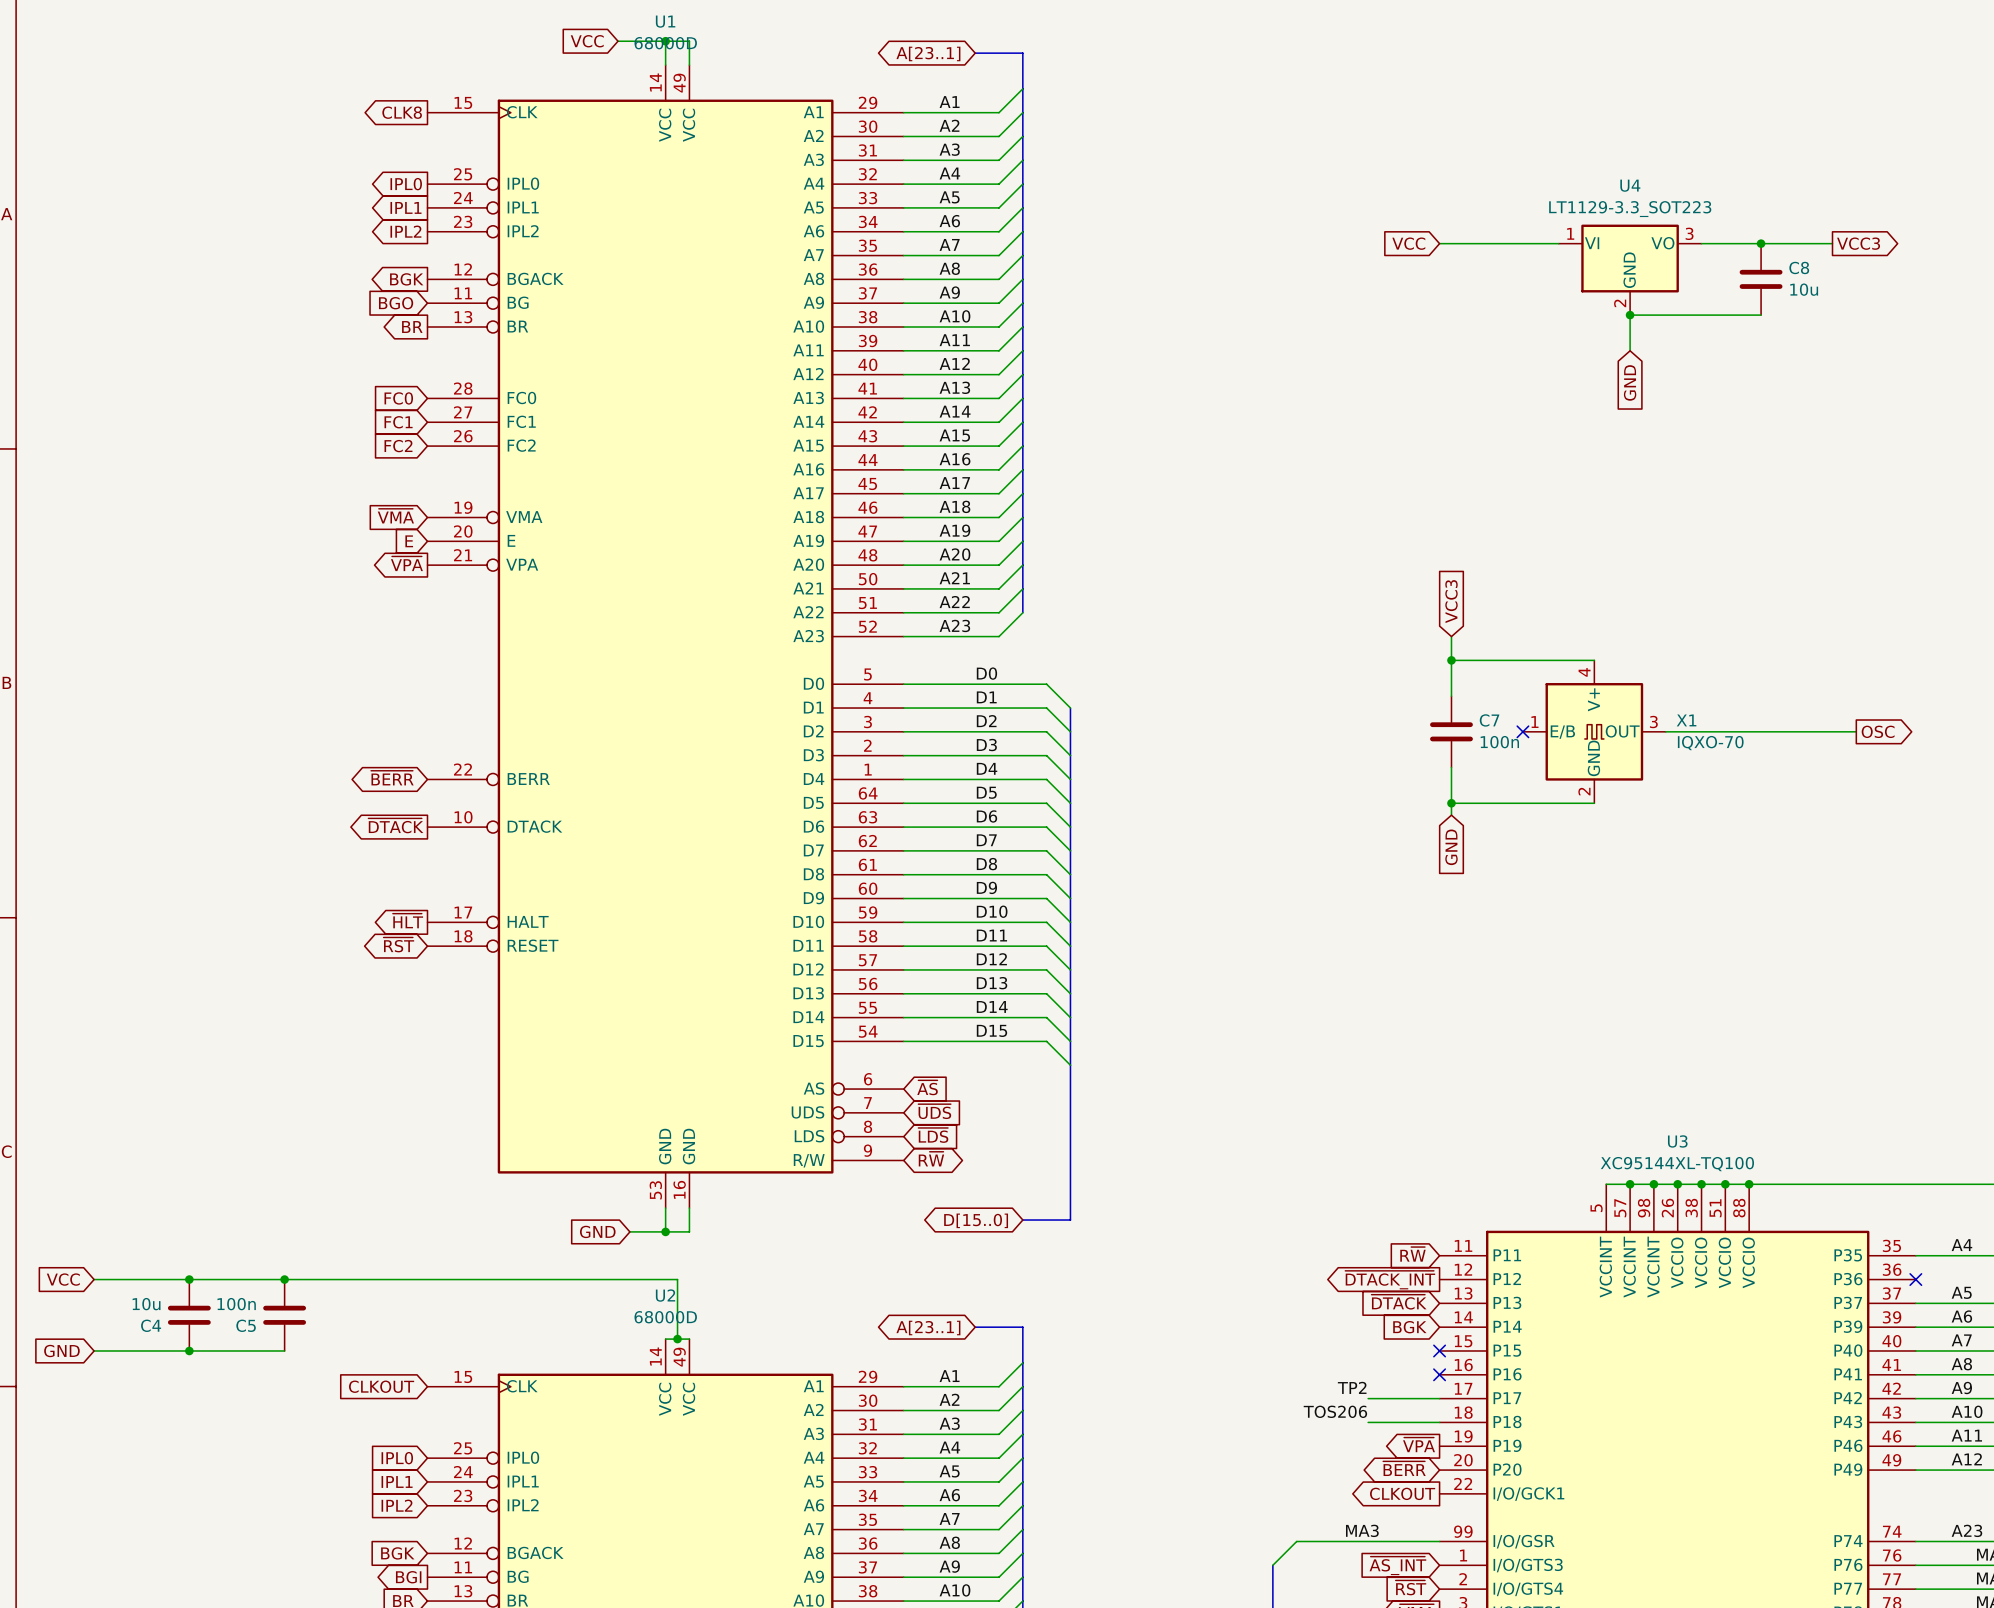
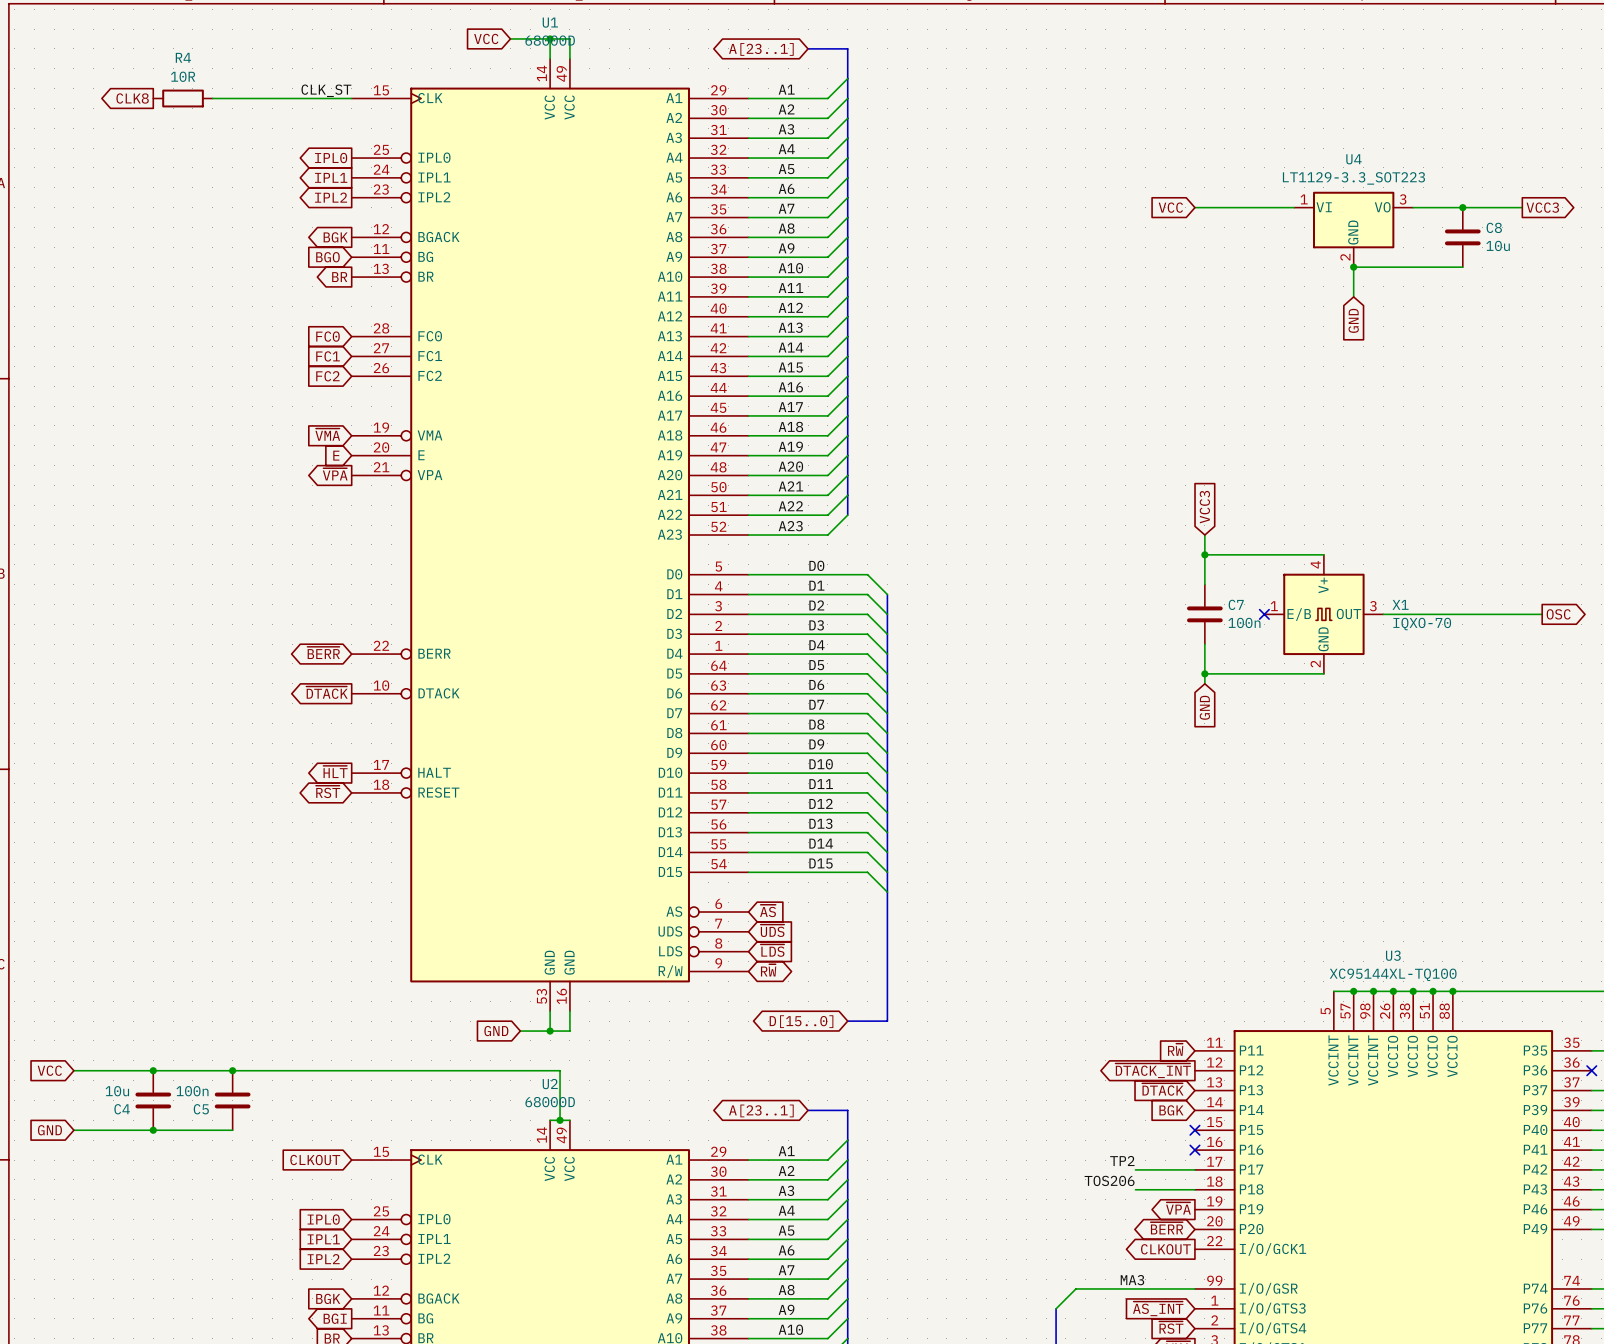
label: none -> CLK_ST (326, 90)
global label: none -> CLK8 (132, 98)
R4: none -> 10R (183, 98)
wire: none -> (212, 98) (351, 98)
global label: CLK8 (402, 112) -> none

